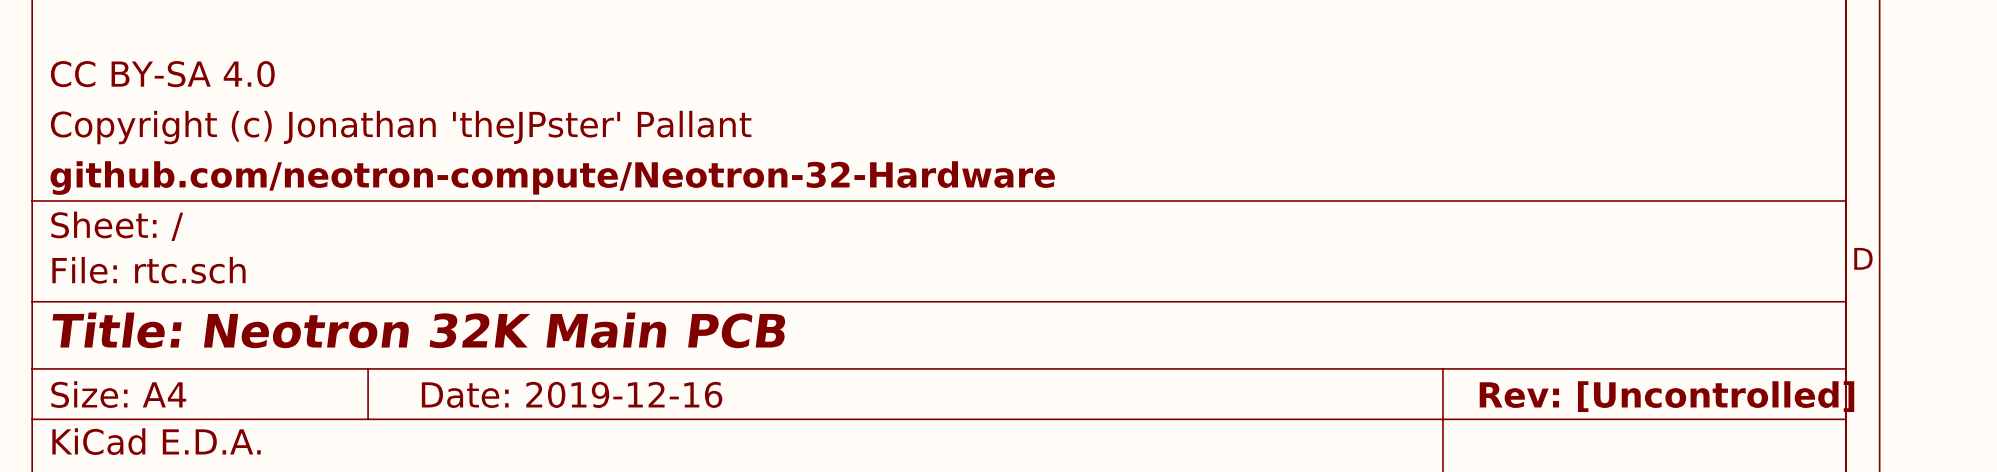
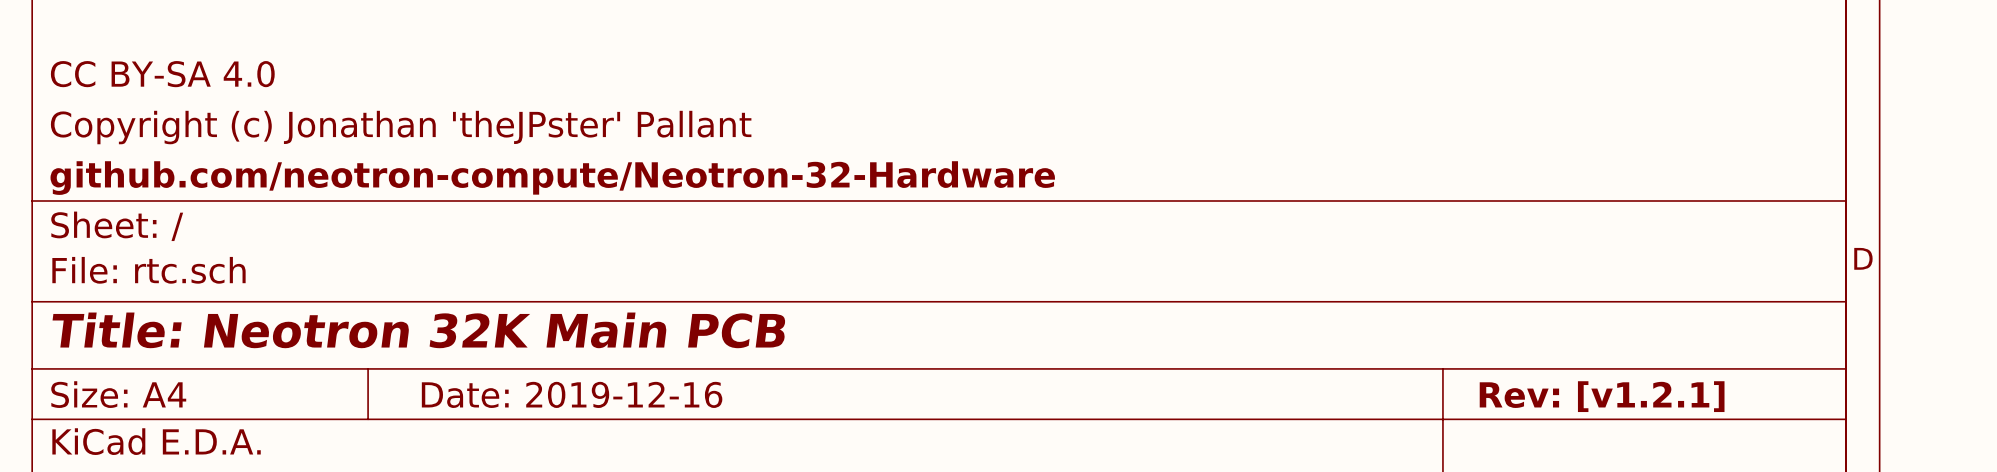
title block: Rev: [Uncontrolled] (1666, 396) -> Rev: [v1.2.1] (1602, 396)

